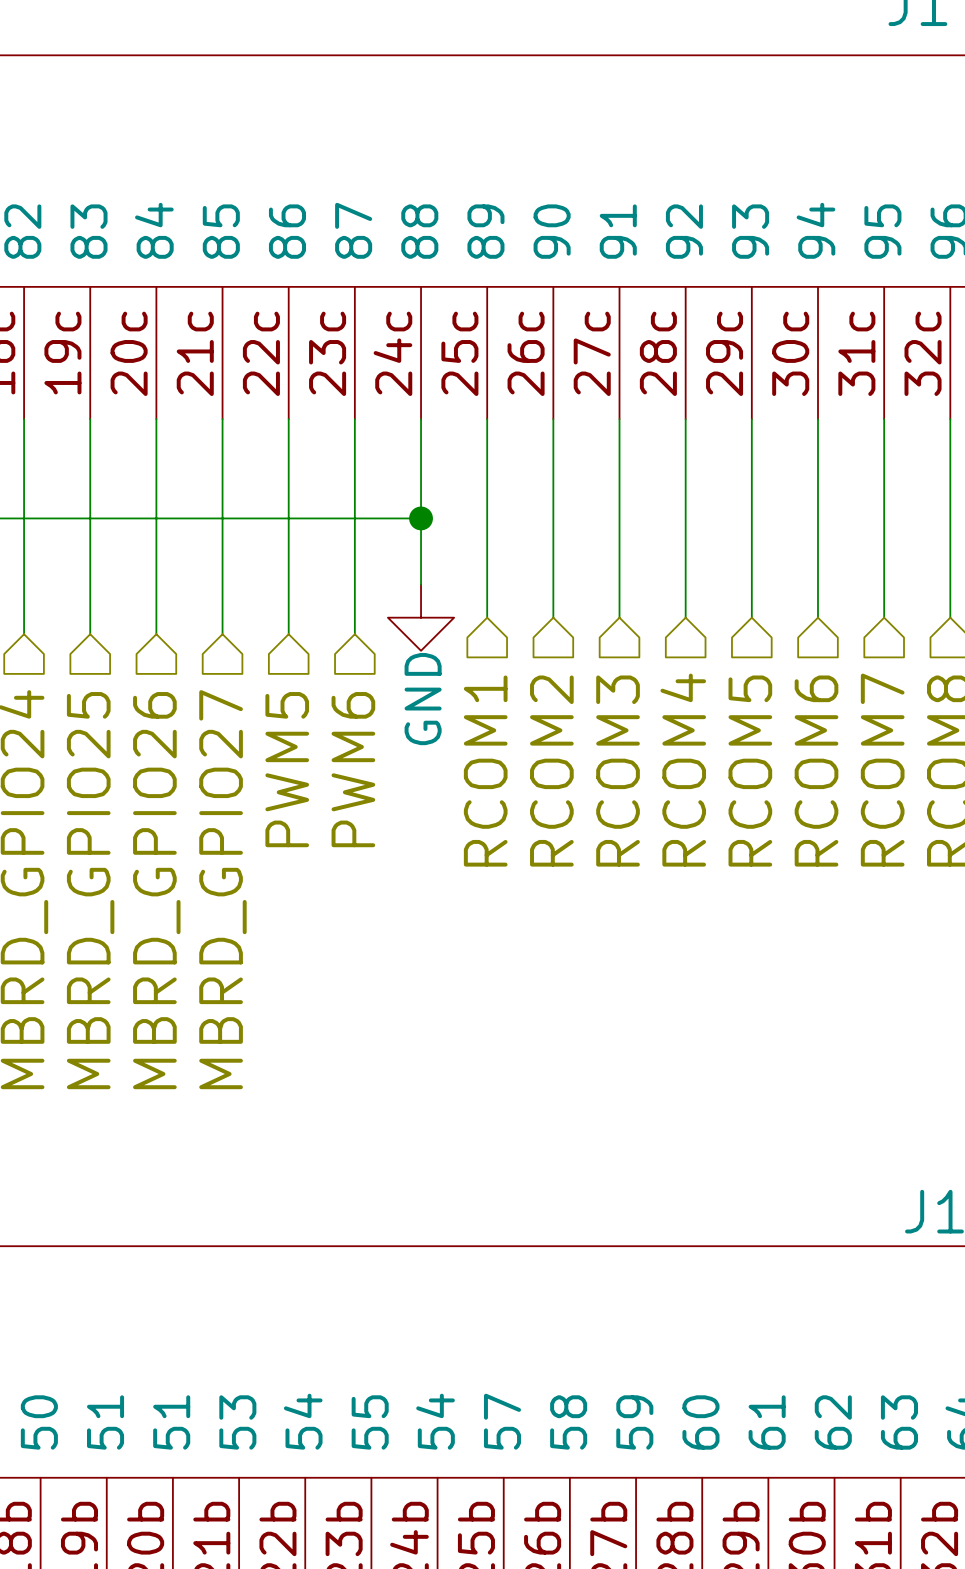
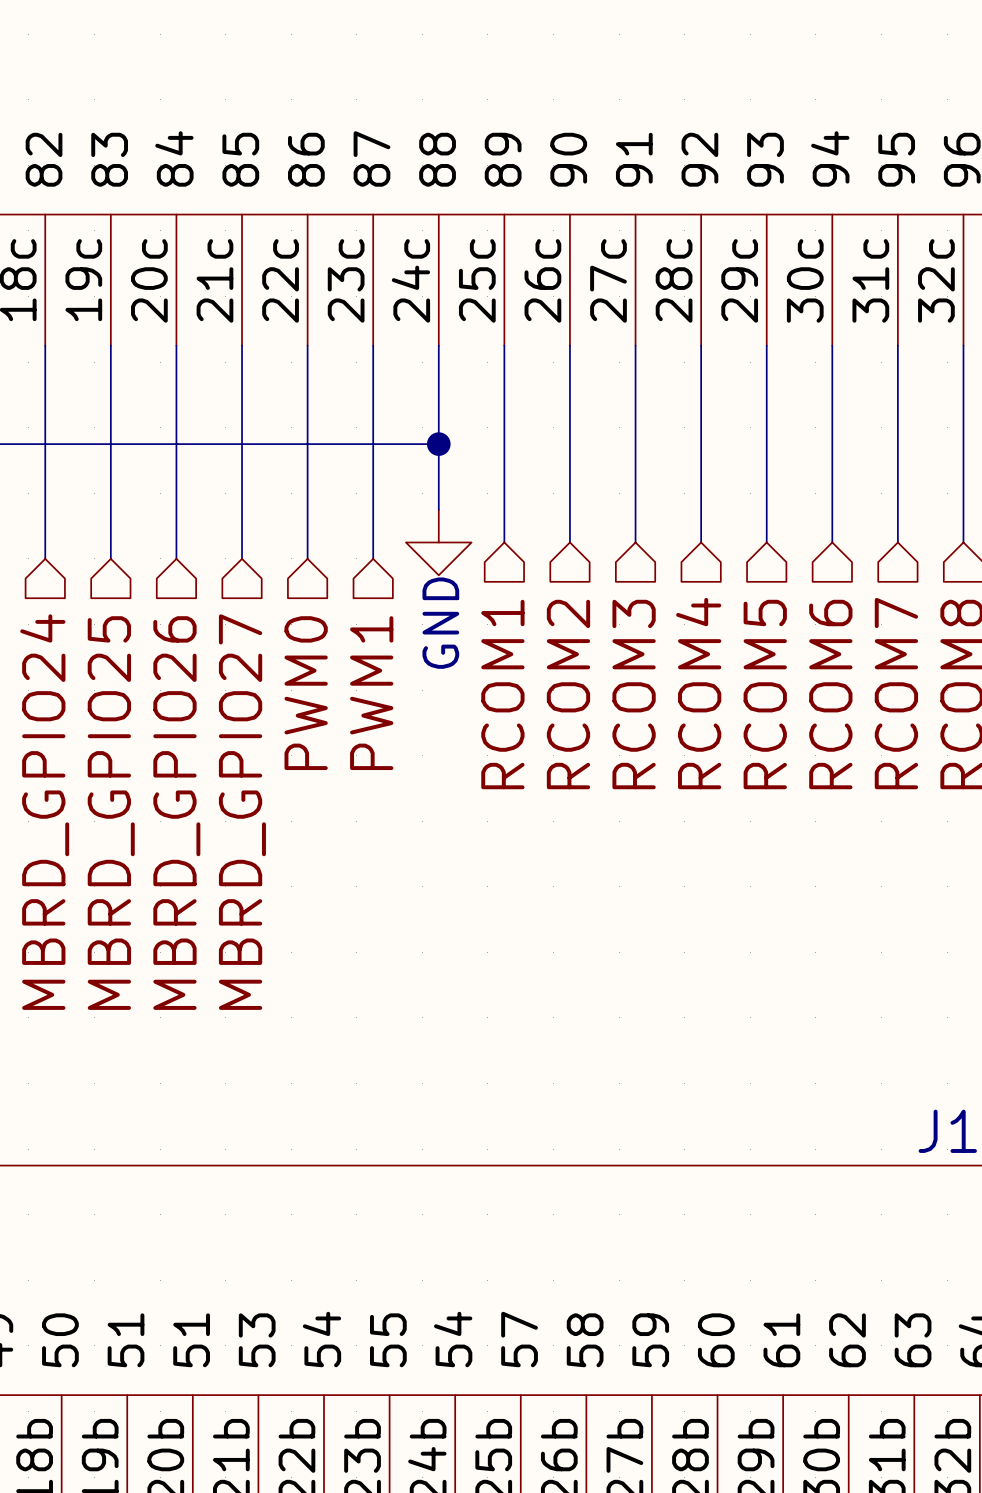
hierarchical label: PWM5 (287, 769) -> PWM0 (306, 693)
hierarchical label: PWM6 (353, 769) -> PWM1 (371, 693)

